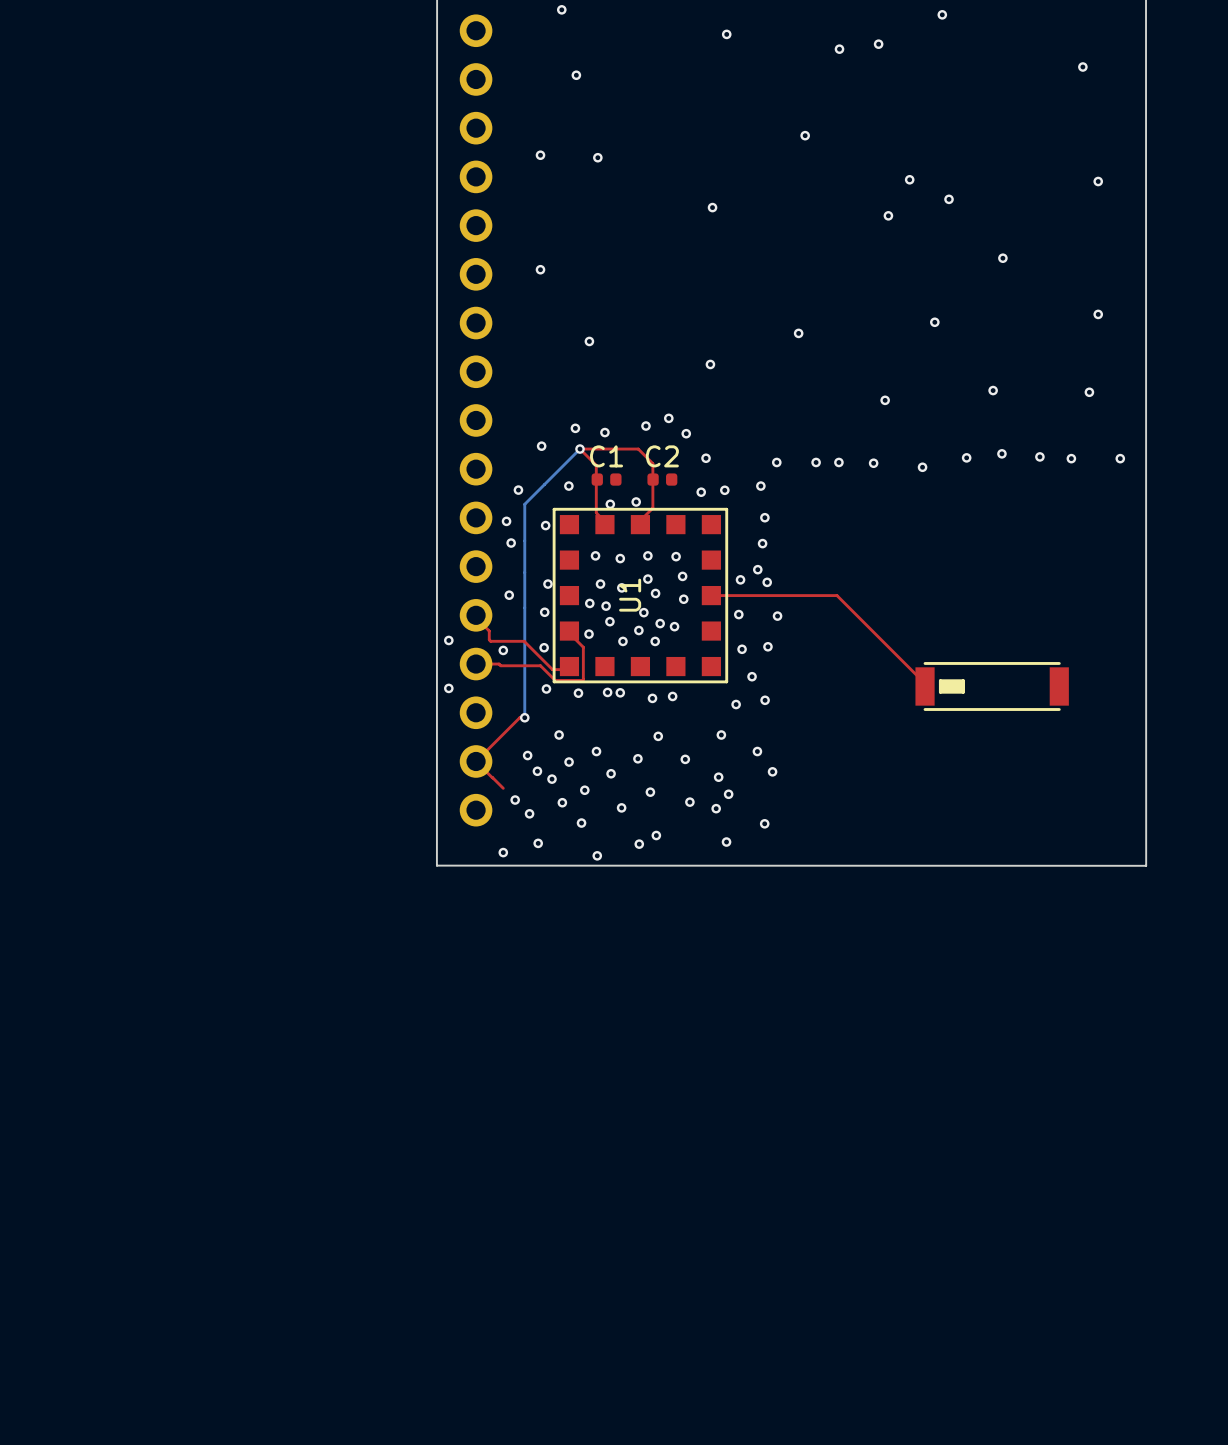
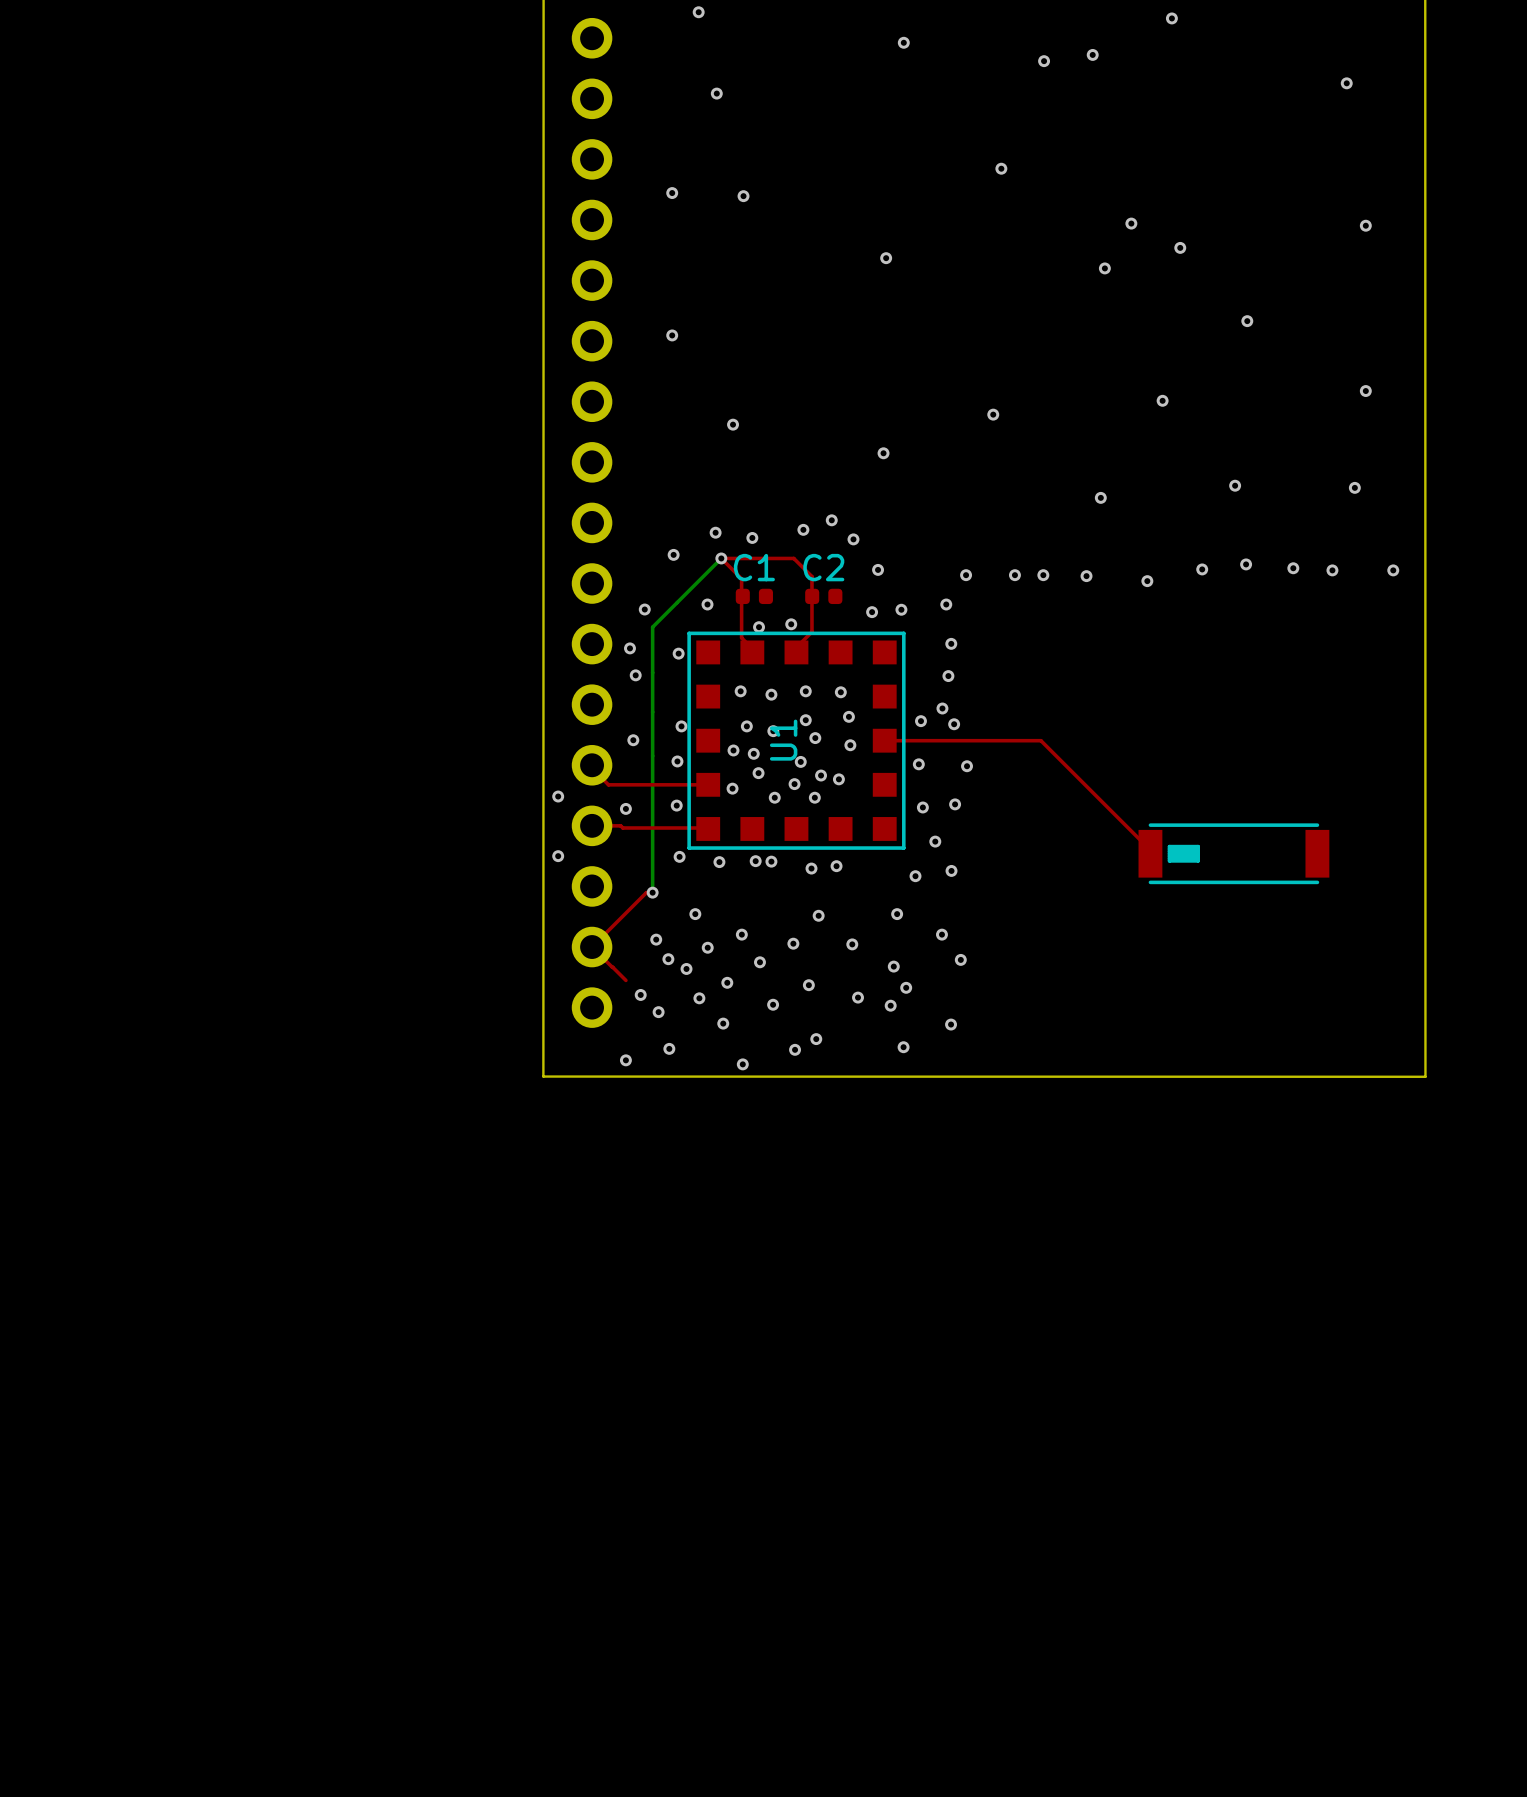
top track: (489, 631) (490, 641) (524, 641) (552, 669) (565, 669) -> (608, 784) (708, 784)
top track: (568, 632) (583, 647) (583, 679) (555, 680) (540, 665) -> (705, 828) (672, 828)

